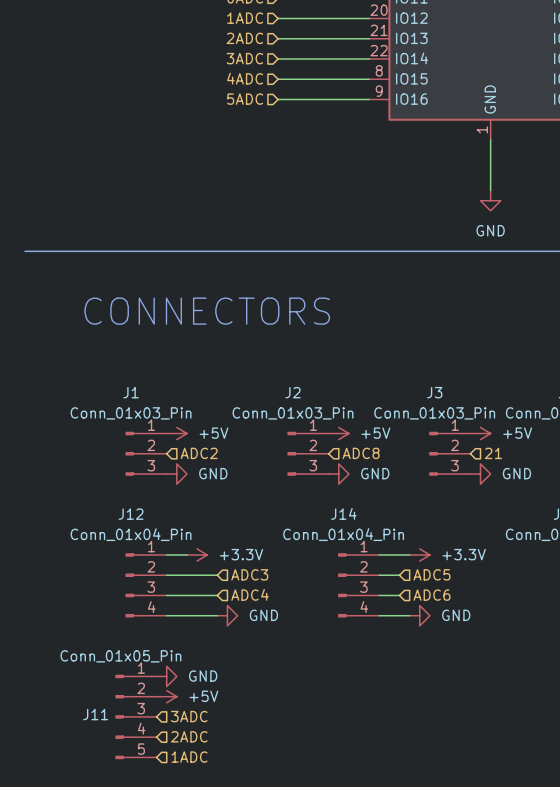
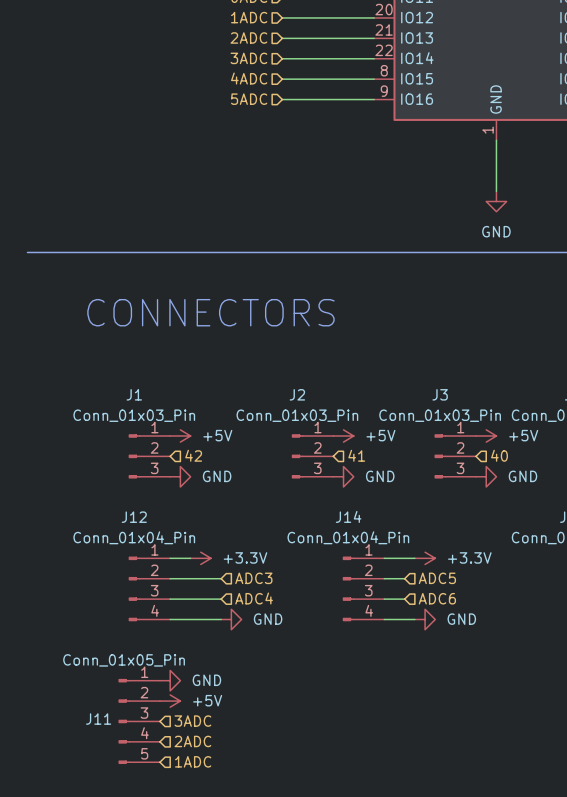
hierarchical label: ADC2 (199, 453) -> 42 (193, 455)
hierarchical label: ADC8 (361, 453) -> 41 (356, 455)
hierarchical label: 21 (493, 453) -> 40 (499, 455)

